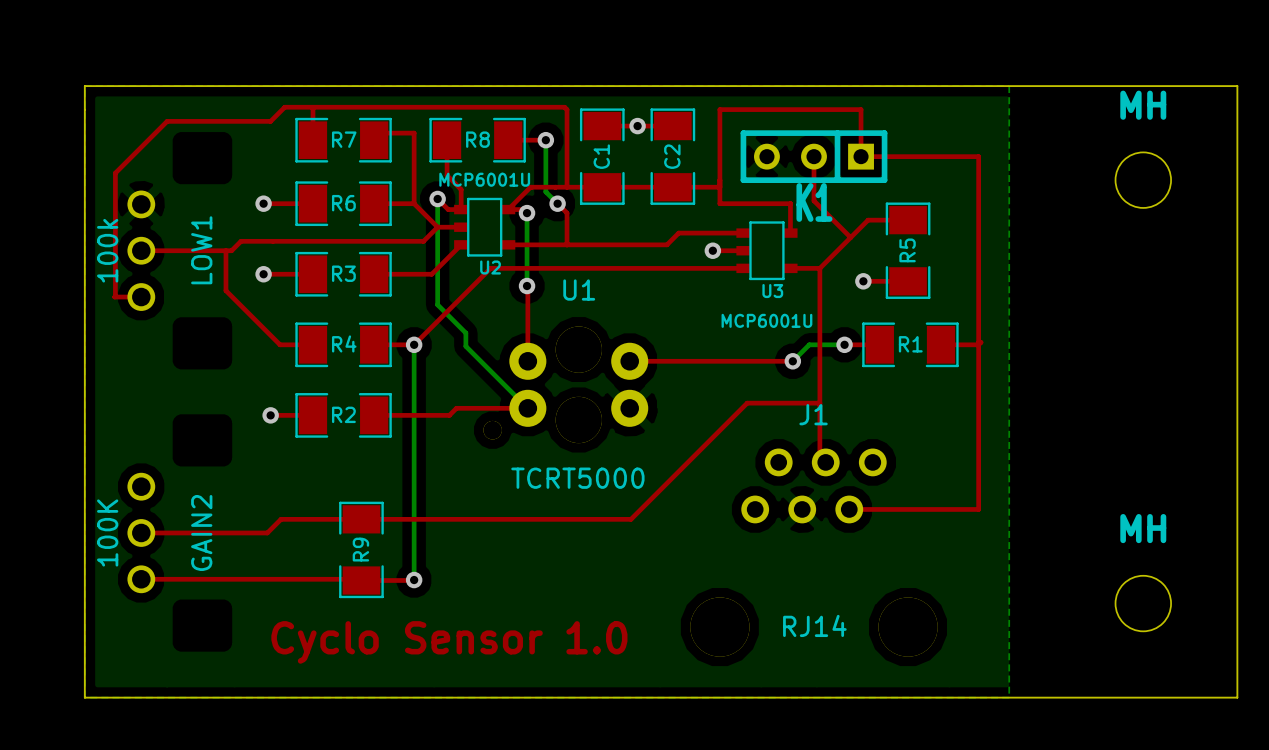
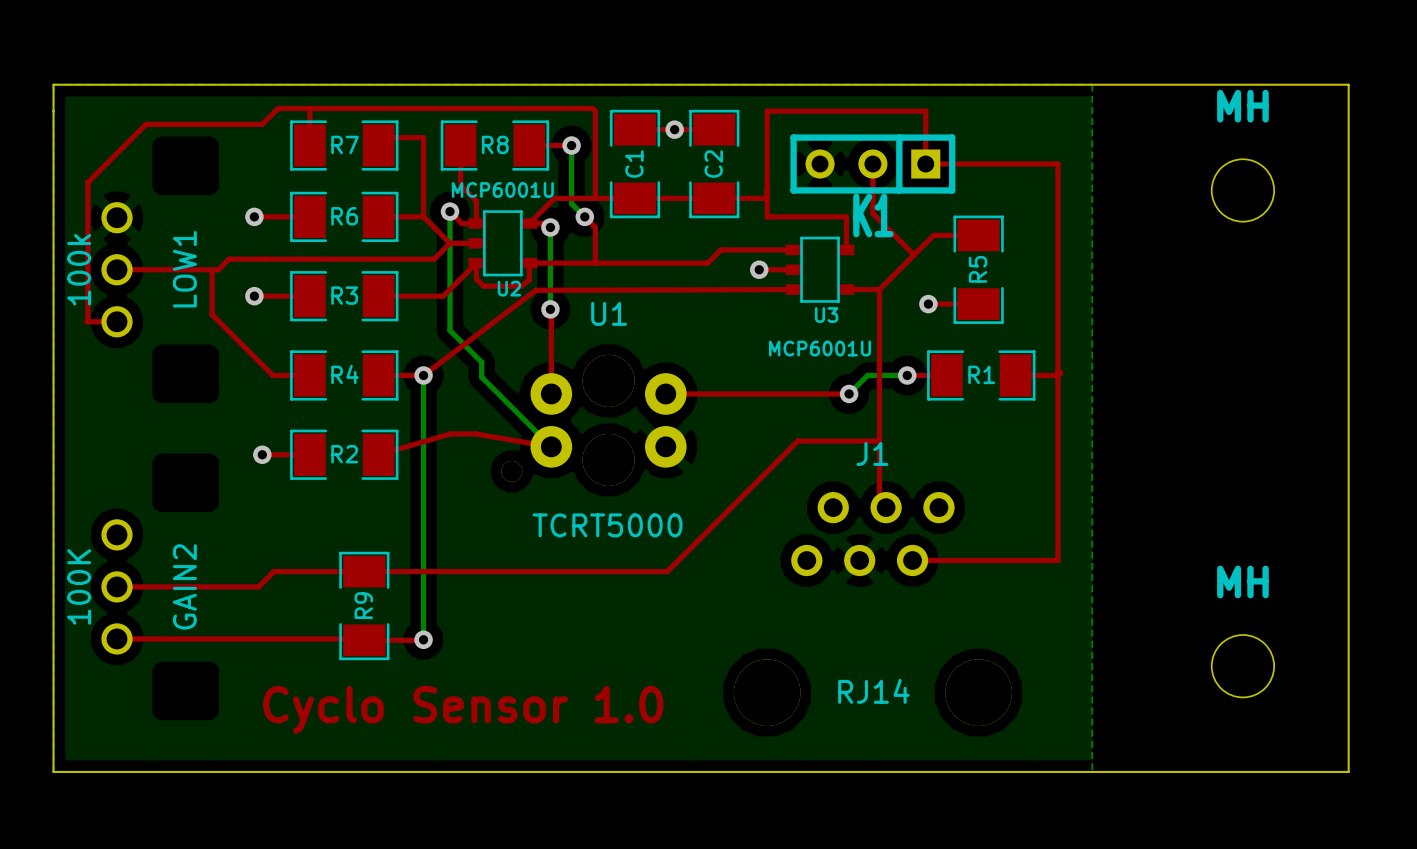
top track: none -> (476, 263) (476, 278) (483, 286) (521, 286) (529, 279) (529, 263)
top track: (743, 268) (490, 268) (414, 344) -> (793, 289) (535, 290) (423, 375)
top track: (527, 408) (456, 408) (449, 415) (374, 415) -> (551, 446) (475, 433) (450, 433) (378, 454)

